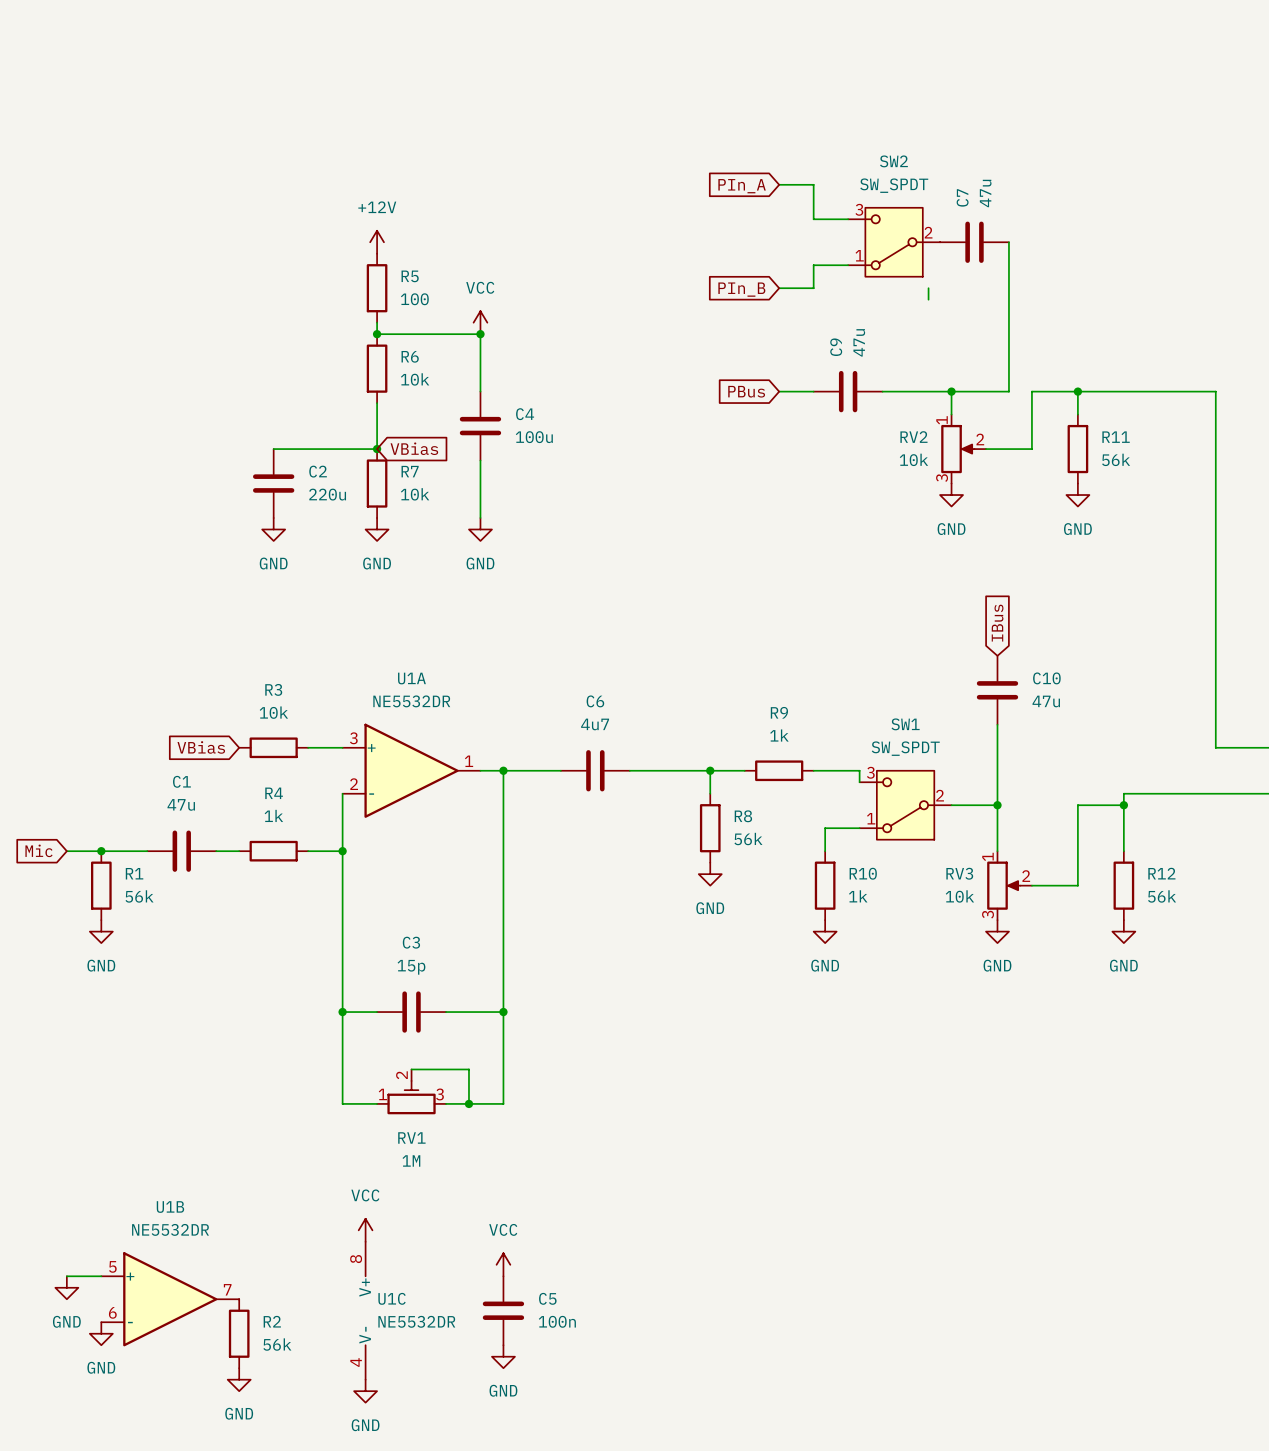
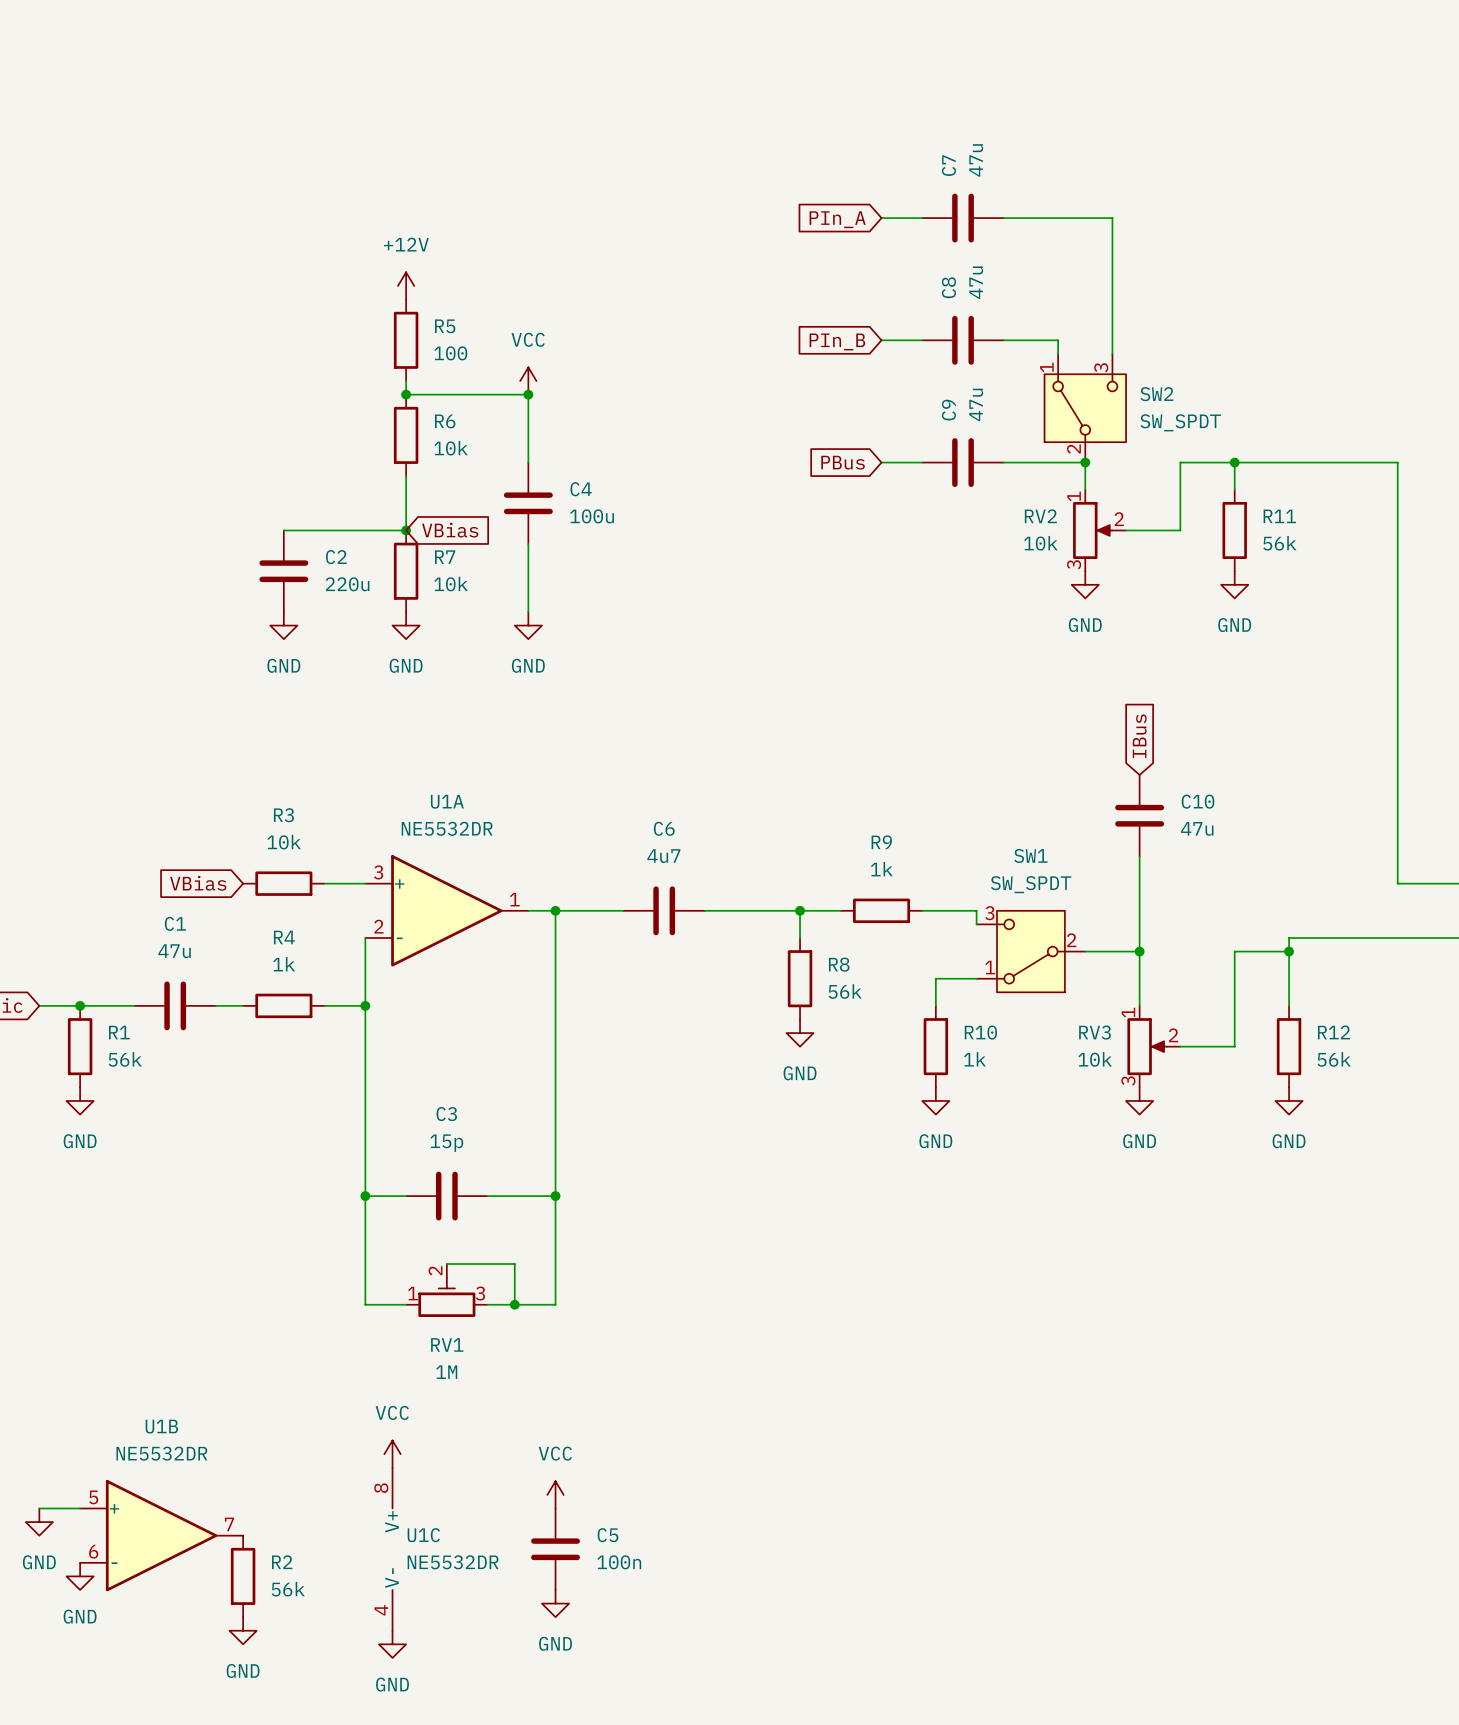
wire: (813, 184) (813, 219) (848, 219) -> none
wire: none -> (1003, 218) (1112, 218) (1112, 353)
SW2 value position: SW_SPDT (894, 185) -> SW_SPDT (1180, 422)
SW2 rotation: 0° (894, 242) -> 90° clockwise (1085, 408)
SW2 position: (894, 242) -> (1085, 408)
C7 position: (974, 242) -> (963, 218)
wire: (1008, 242) (1008, 391) (951, 391) -> none
wire: (848, 265) (813, 265) (813, 288) -> none
C8: none -> 47u (963, 340)
wire: none -> (1003, 340) (1058, 340)

